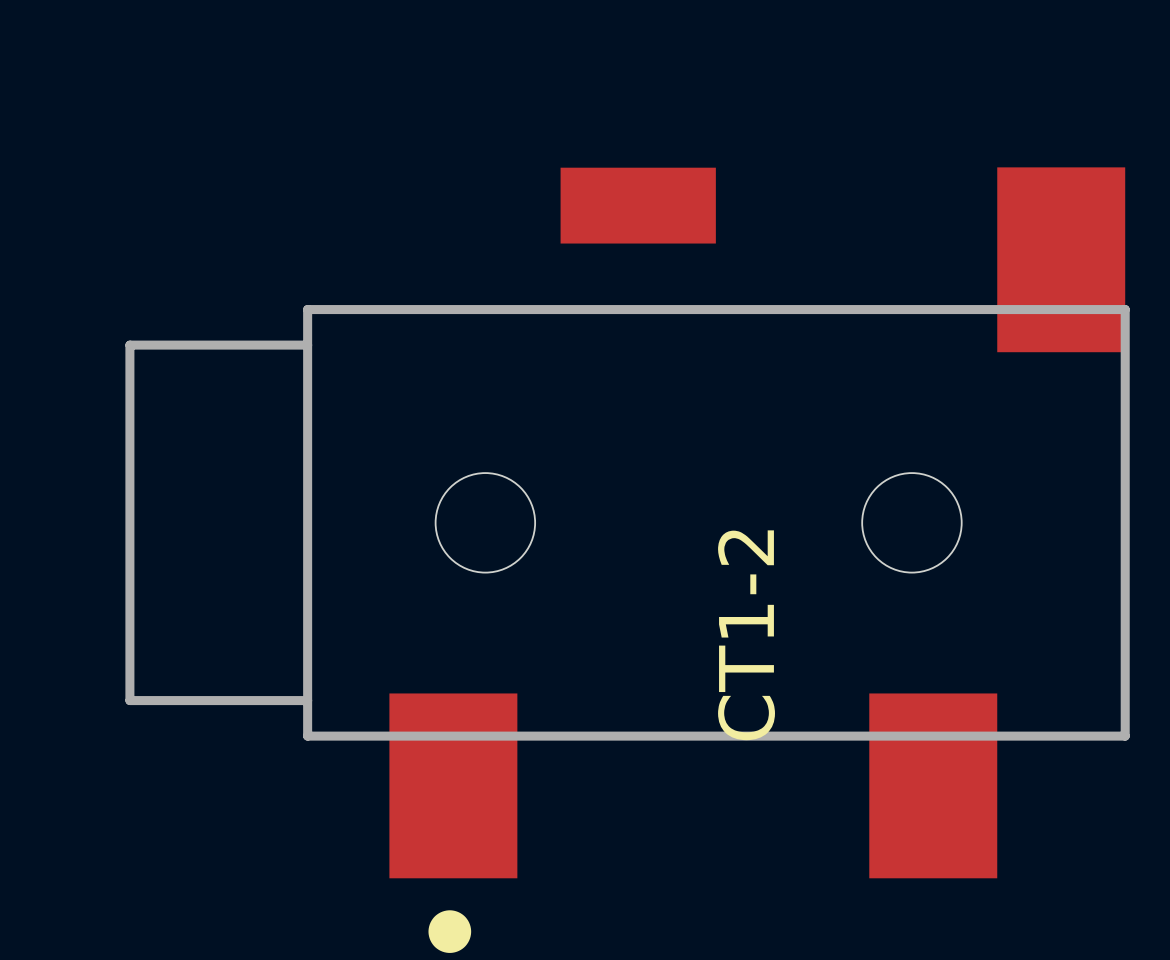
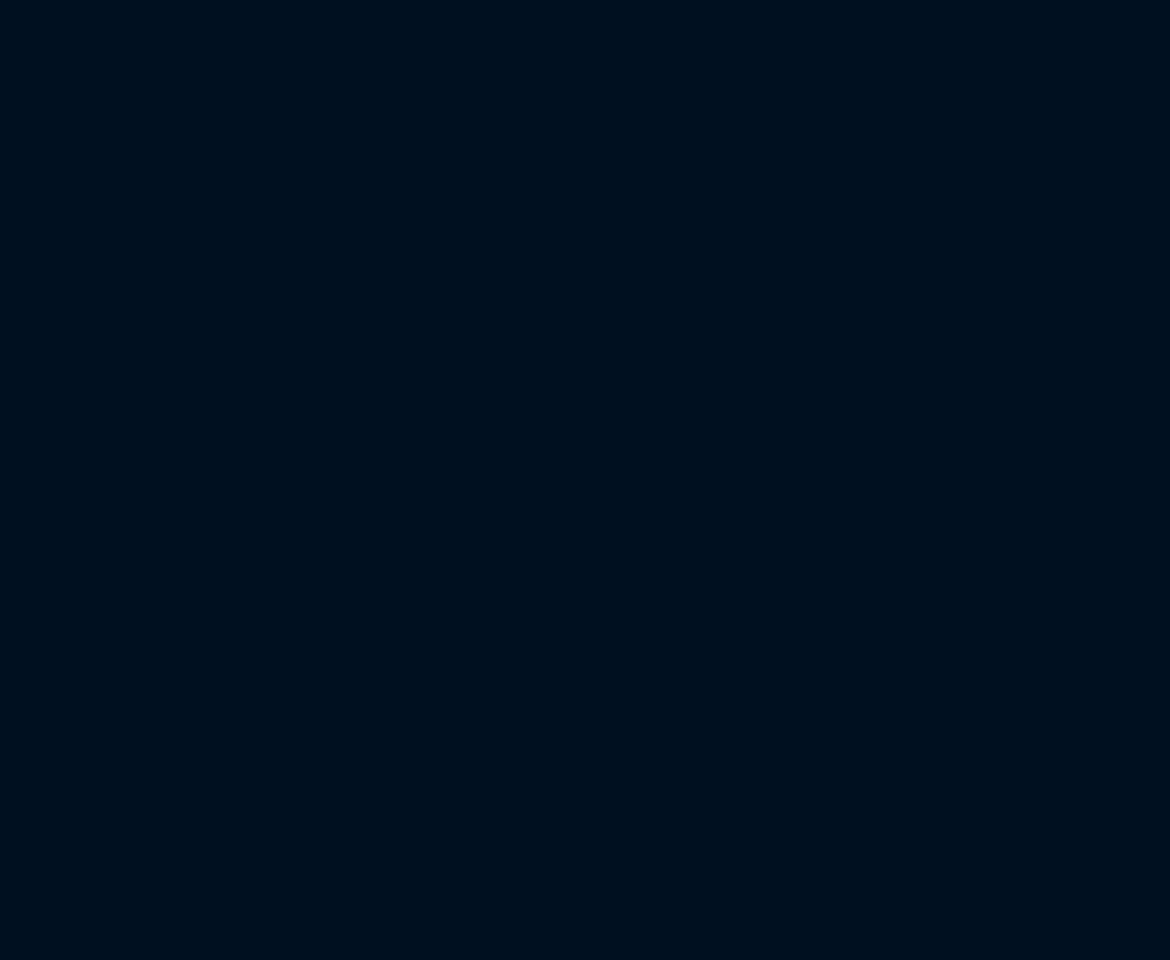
CT1-2: (627, 560) -> none

